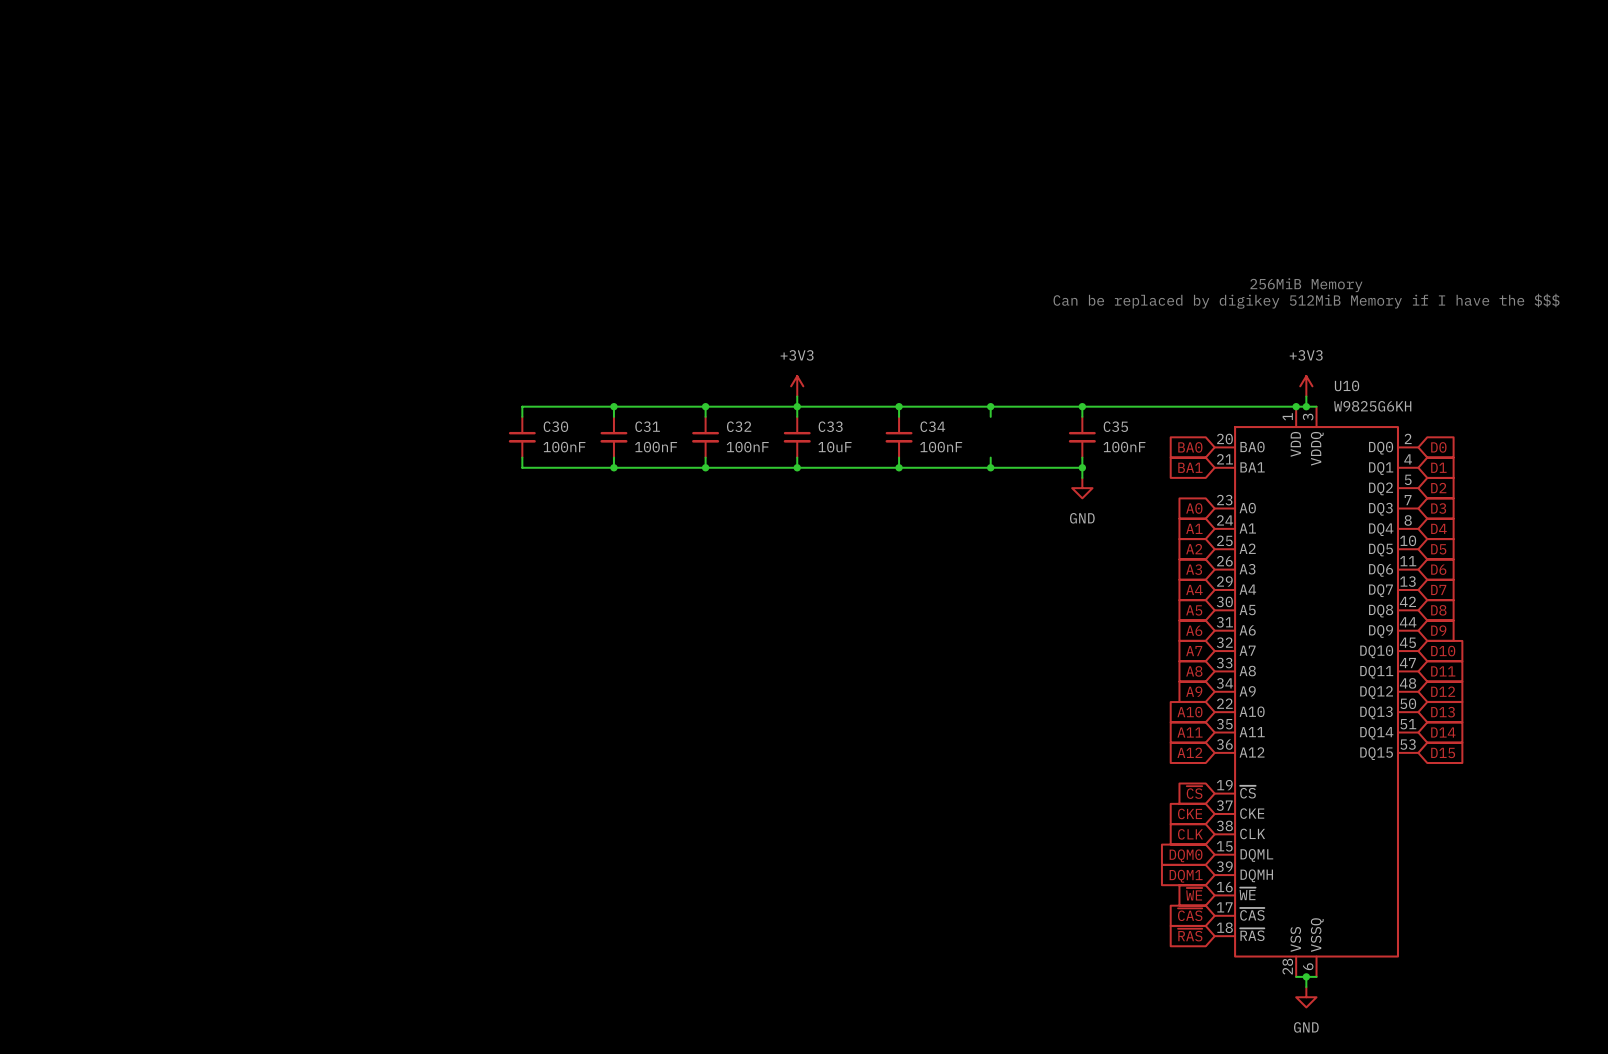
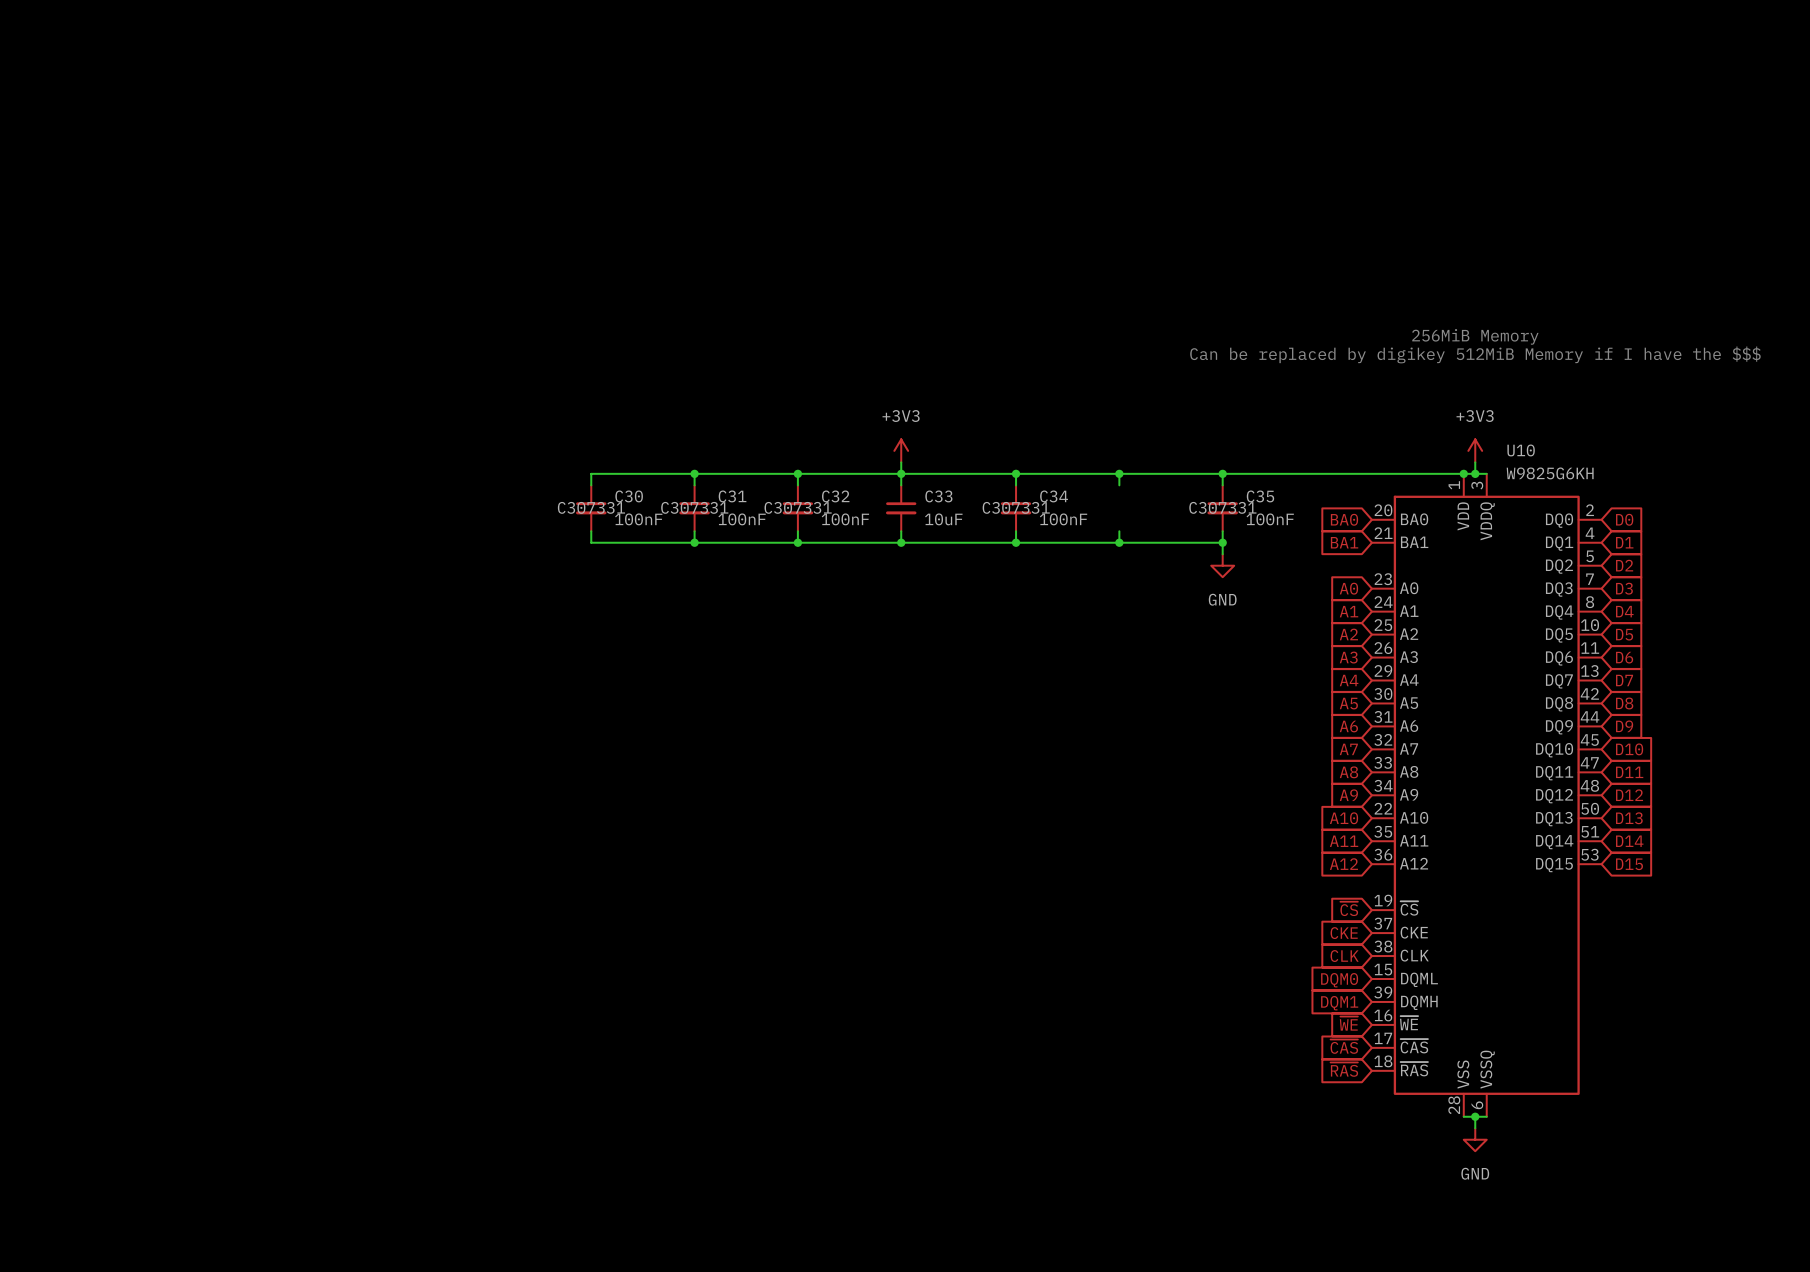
C30 text: none -> C307331 (591, 507)
C31 text: none -> C307331 (694, 507)
C32 text: none -> C307331 (798, 507)
C34 text: none -> C307331 (1016, 507)
C35 text: none -> C307331 (1222, 507)

